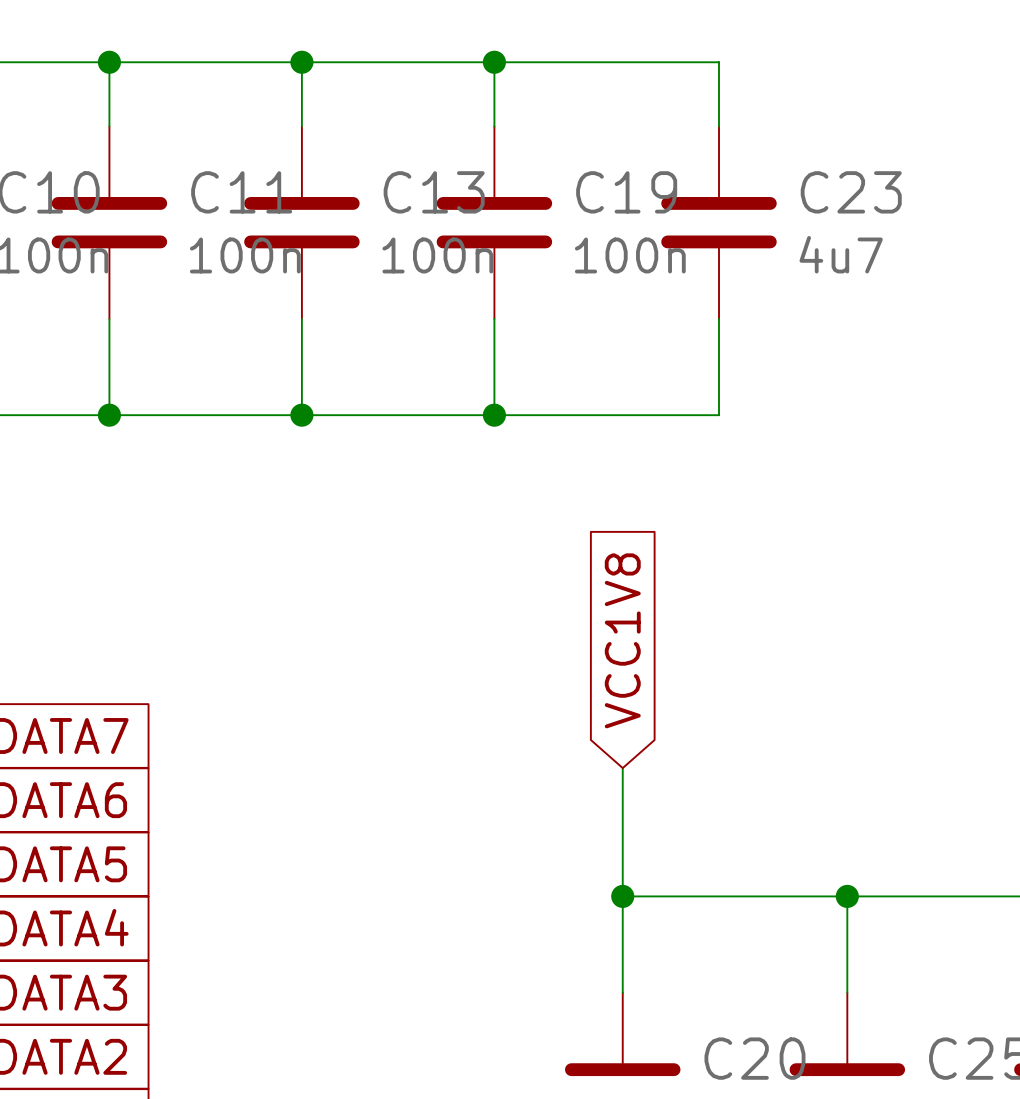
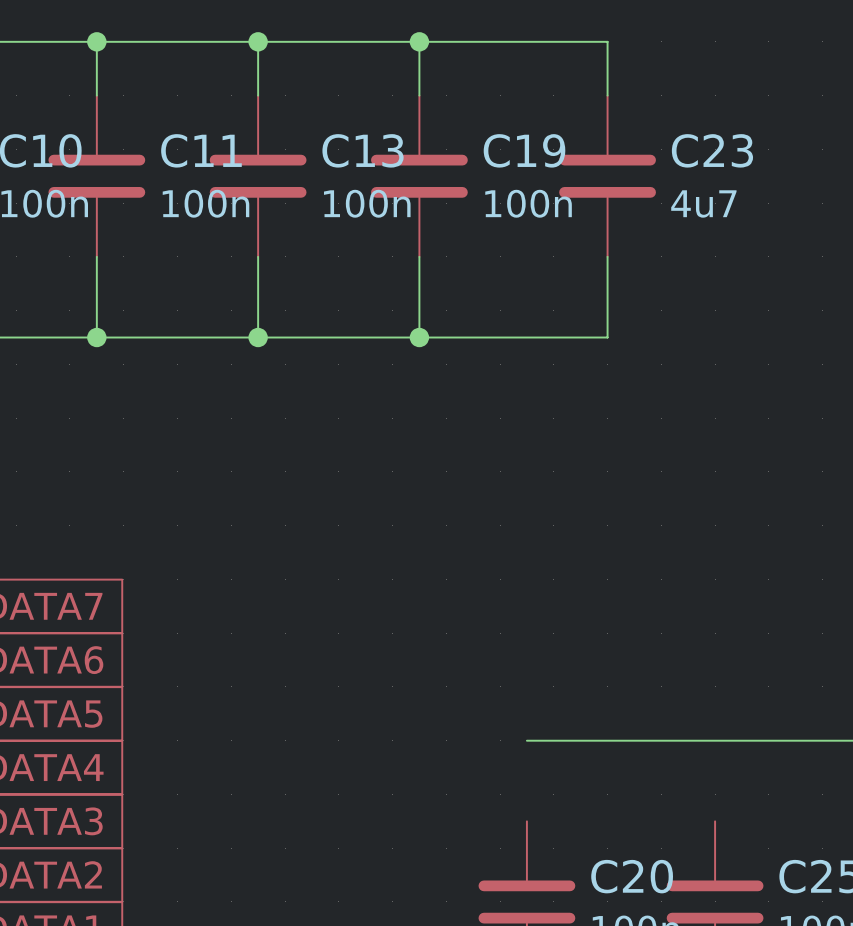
global label: VCC1V8 (622, 640) -> none
wire: (622, 768) (622, 992) -> none
junction: (622, 896) -> none
wire: (847, 896) (847, 992) -> none
junction: (847, 896) -> none

